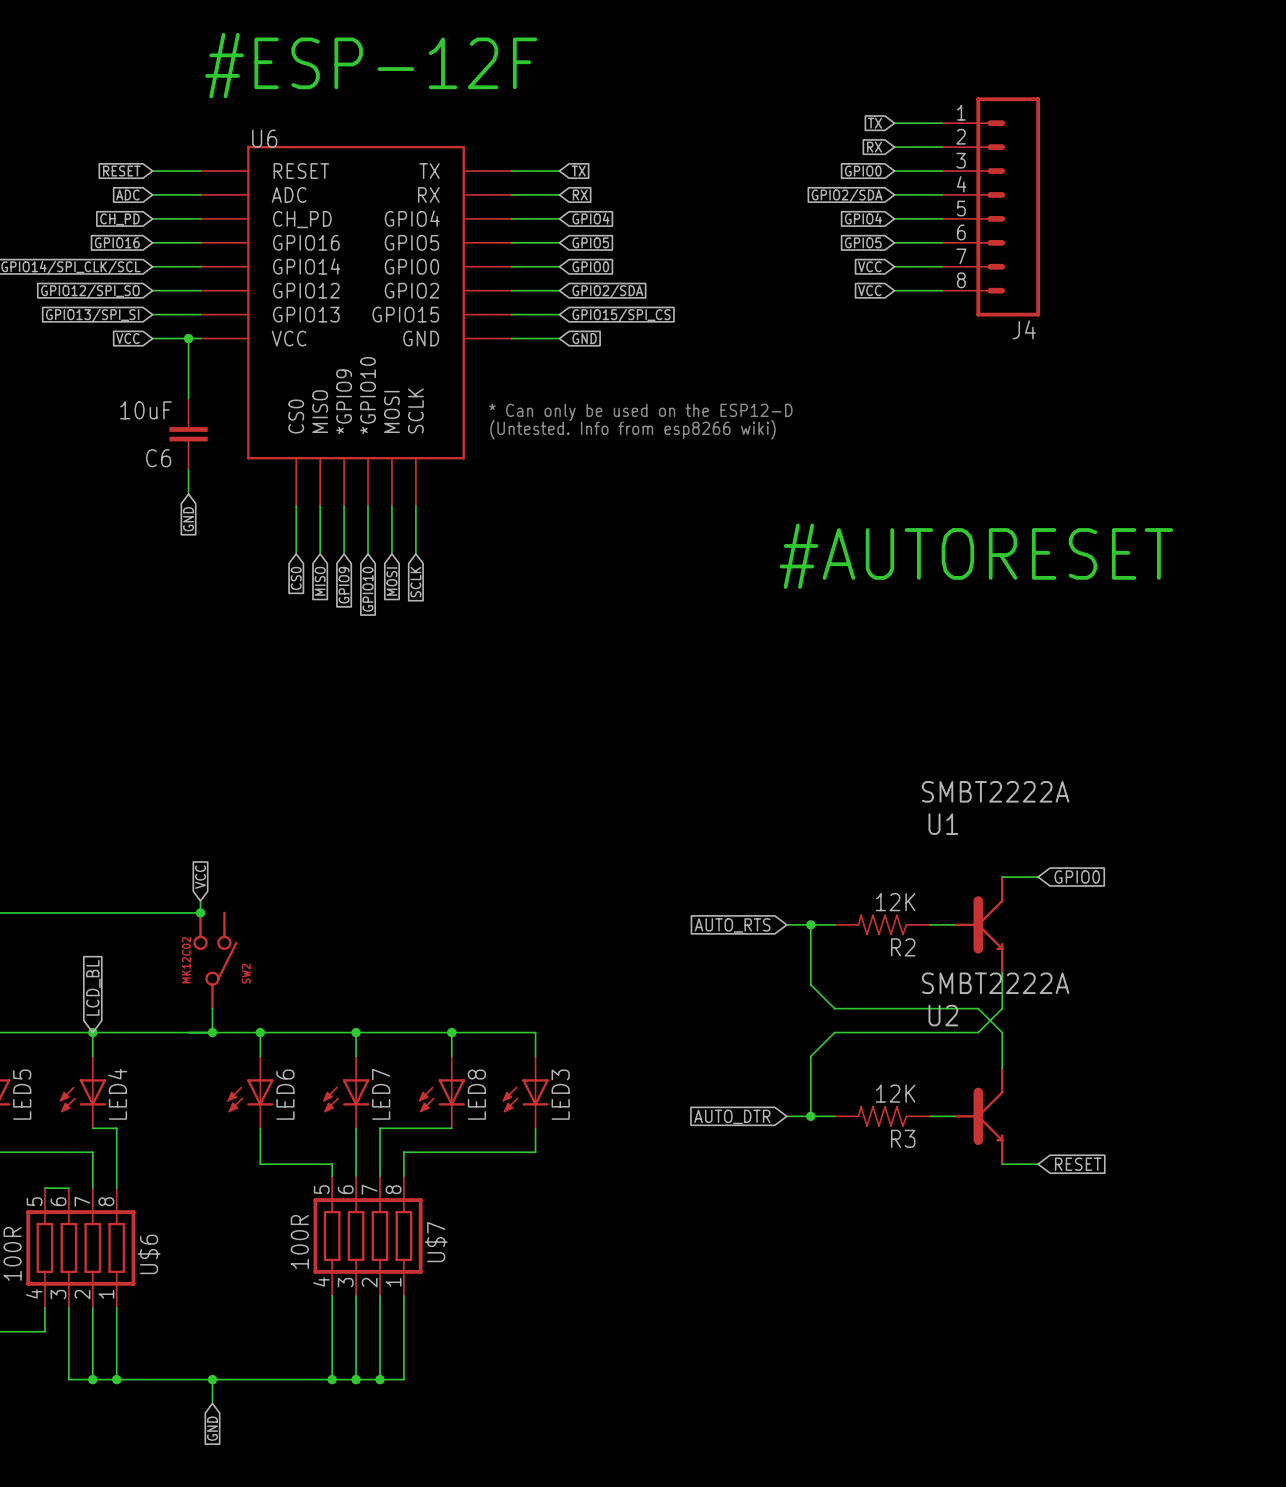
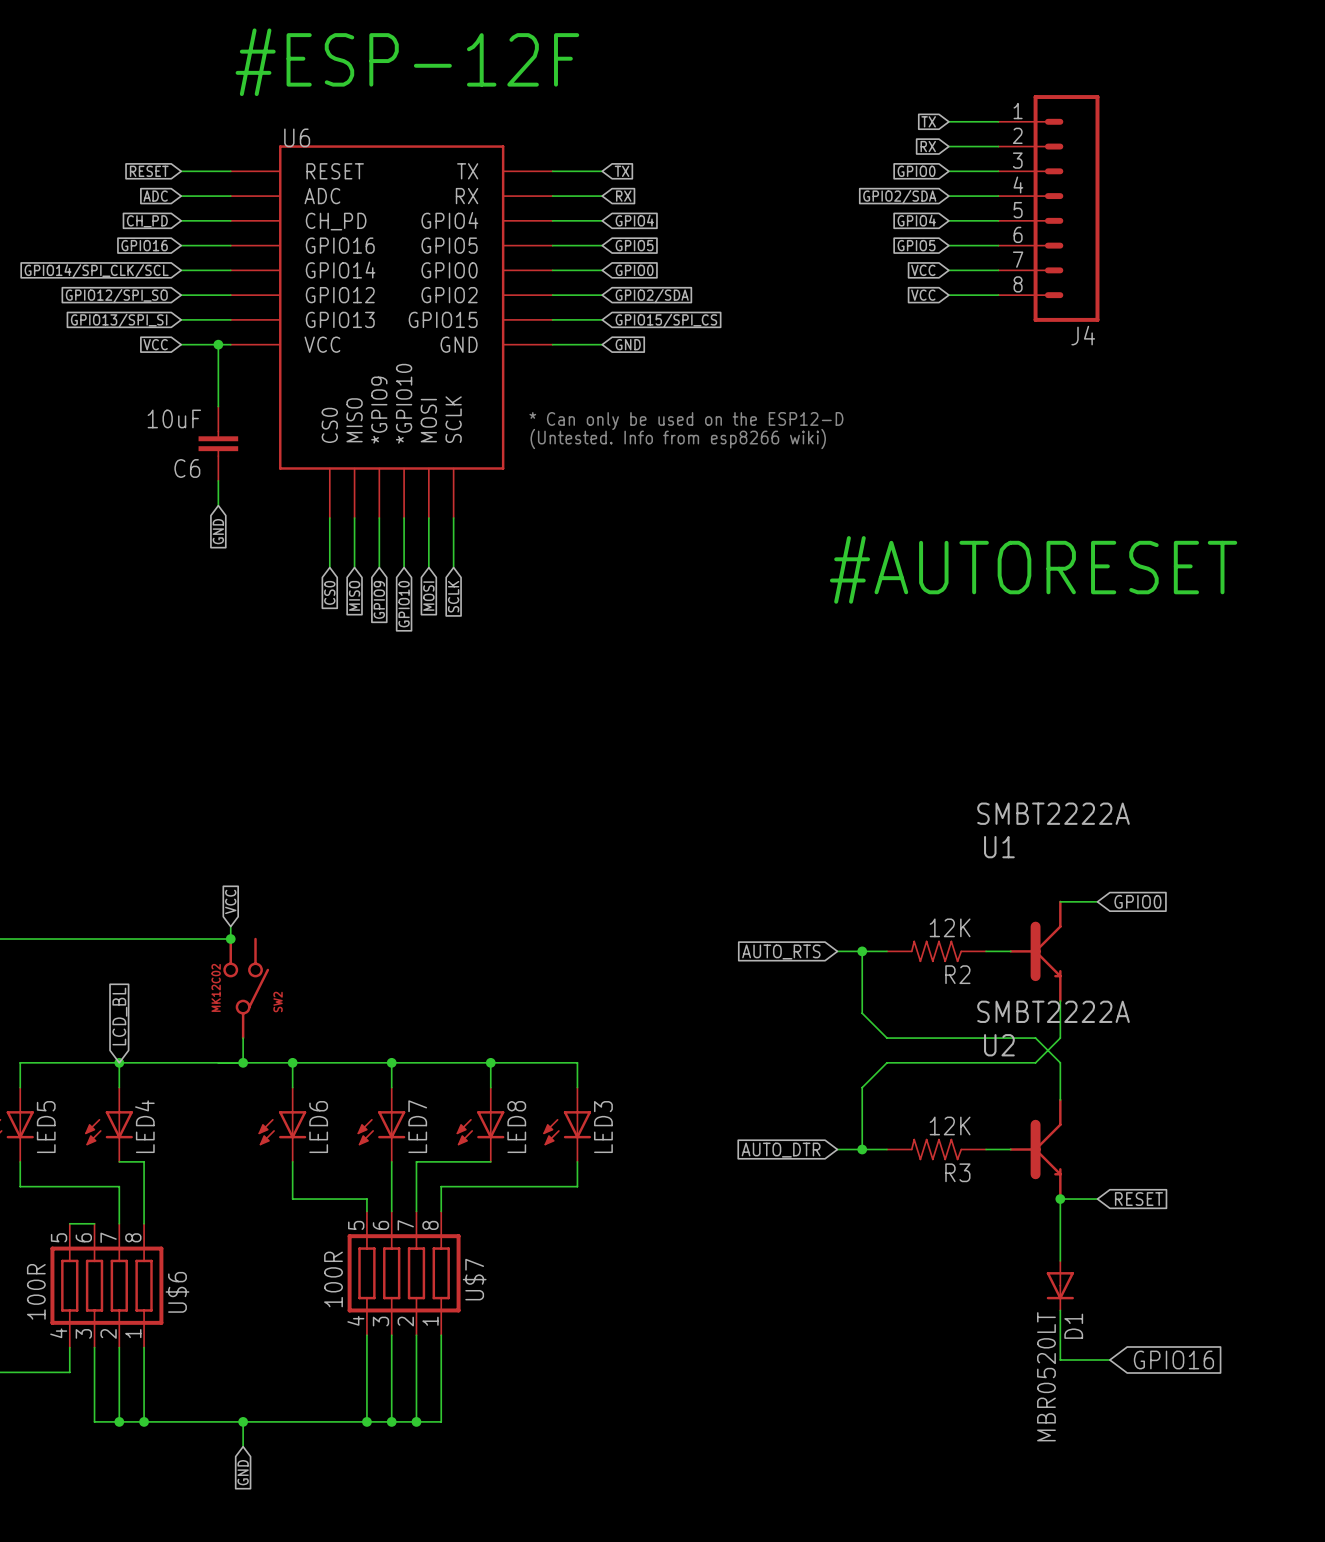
wire: none -> (1060, 1199) (1060, 1260)
junction: none -> (1060, 1199)
D1: none -> MBR0520LT (1060, 1285)
wire: none -> (1060, 1310) (1060, 1360) (1109, 1360)
global label: none -> GPIO16 (1173, 1360)

